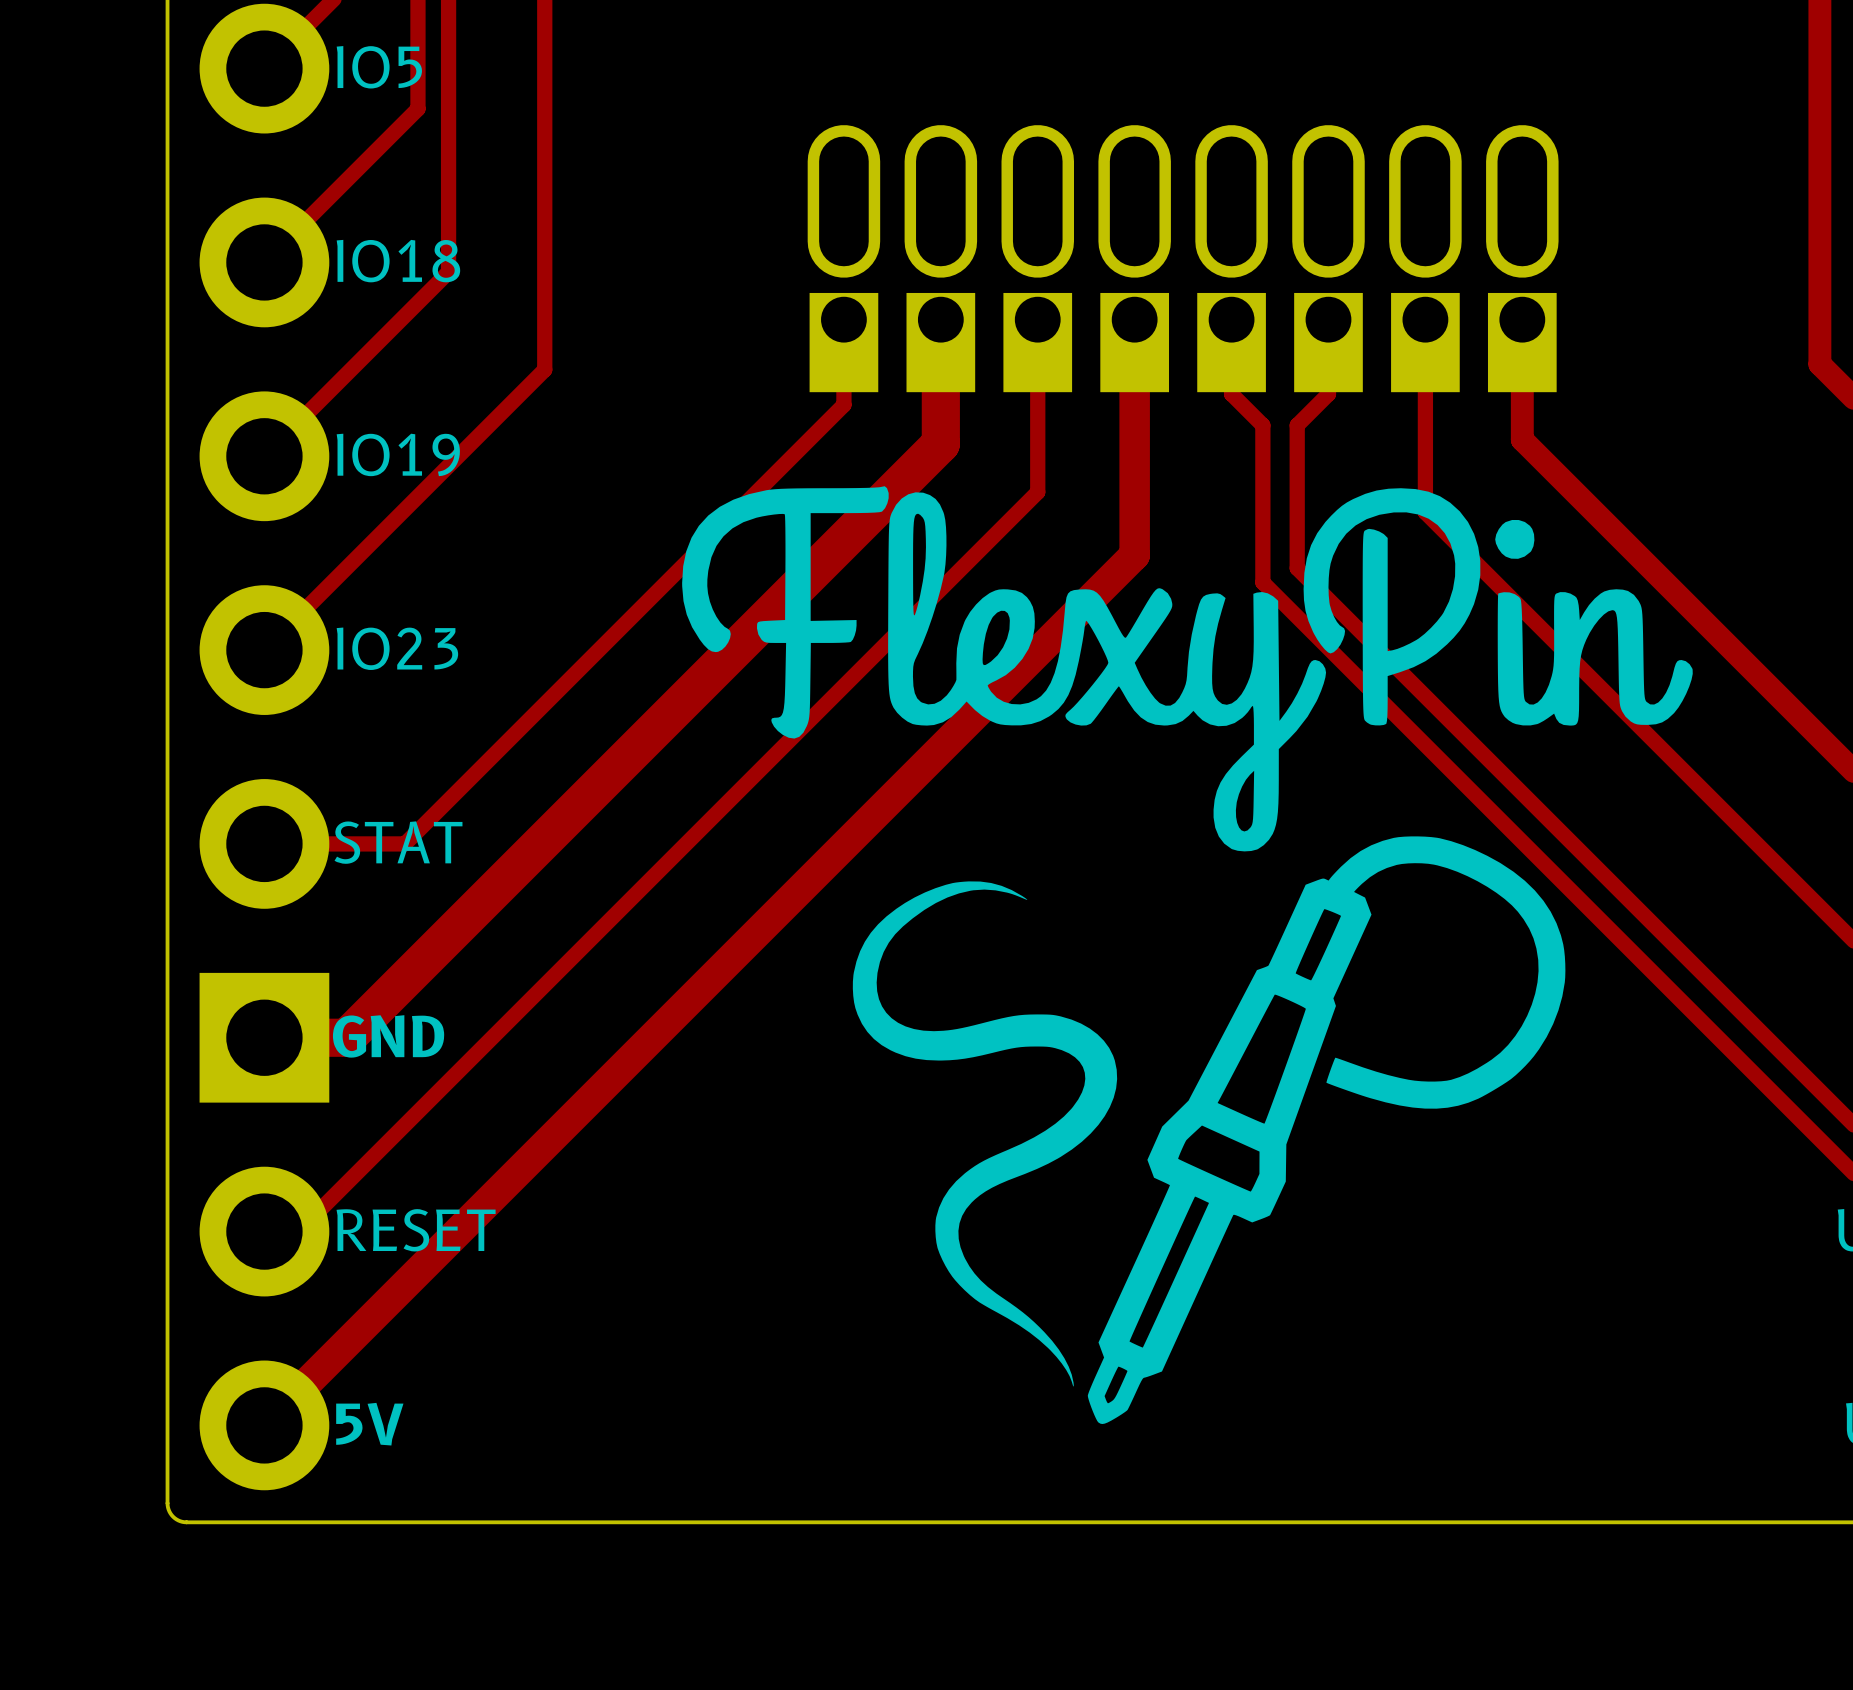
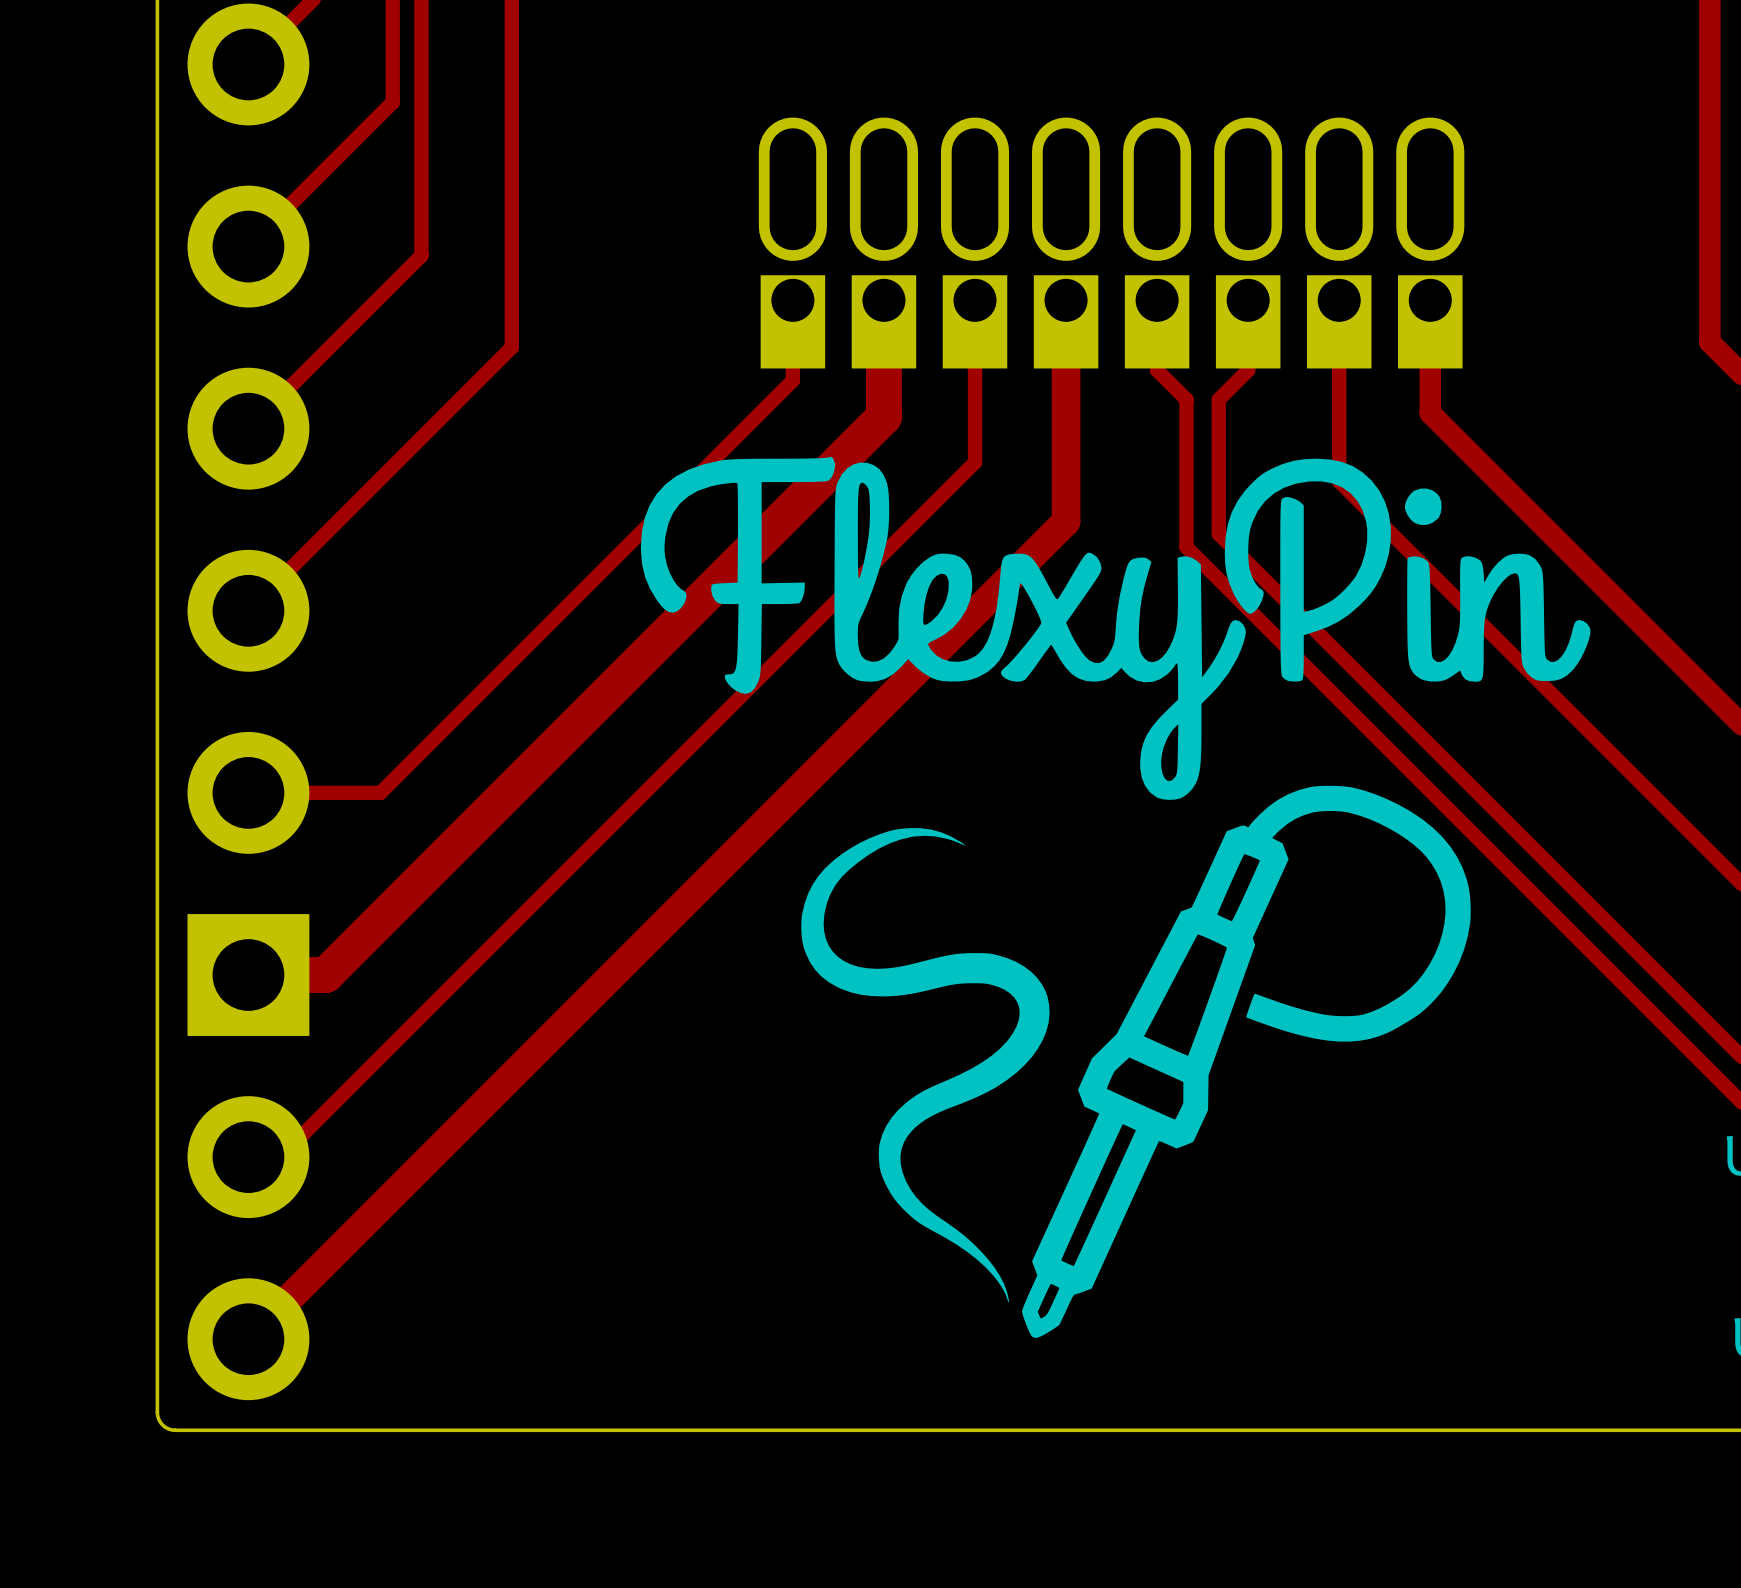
text: IO5 (379, 67) -> none
text: IO18 (398, 261) -> none
text: IO19 (398, 454) -> none
text: IO23 (397, 648) -> none
text: STAT (398, 842) -> none
text: GND (388, 1036) -> none
text: RESET (416, 1230) -> none
text: 5V (369, 1424) -> none

